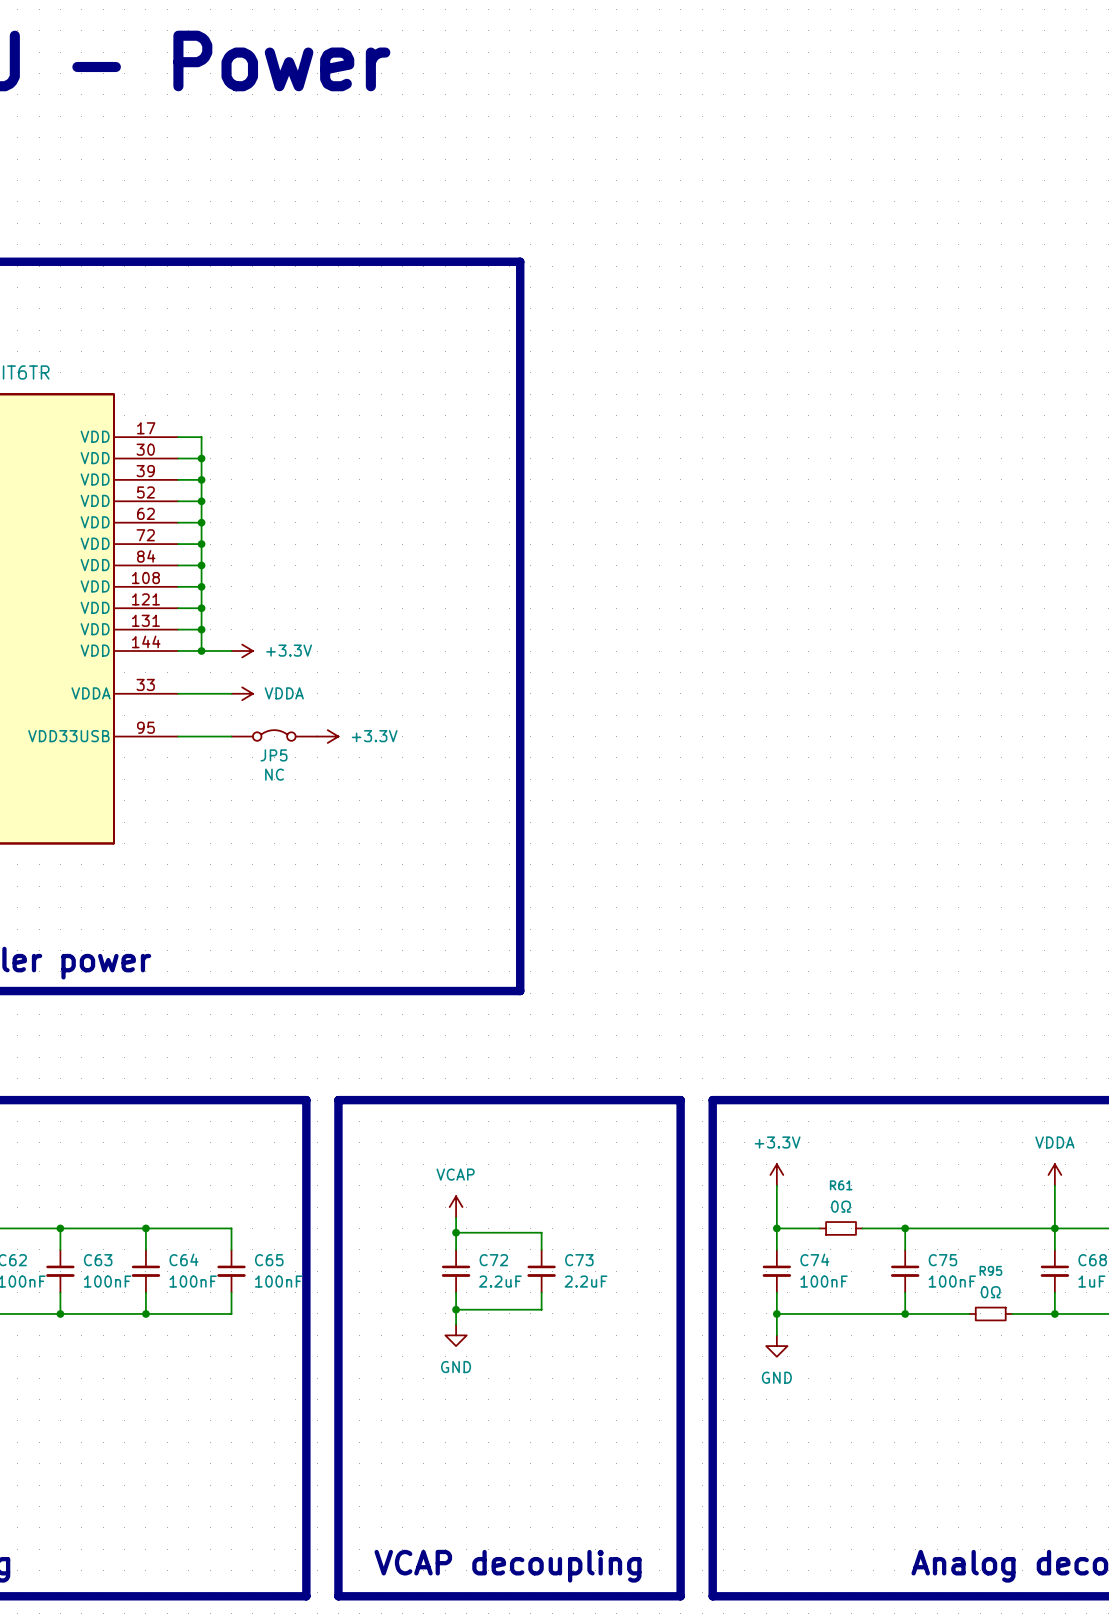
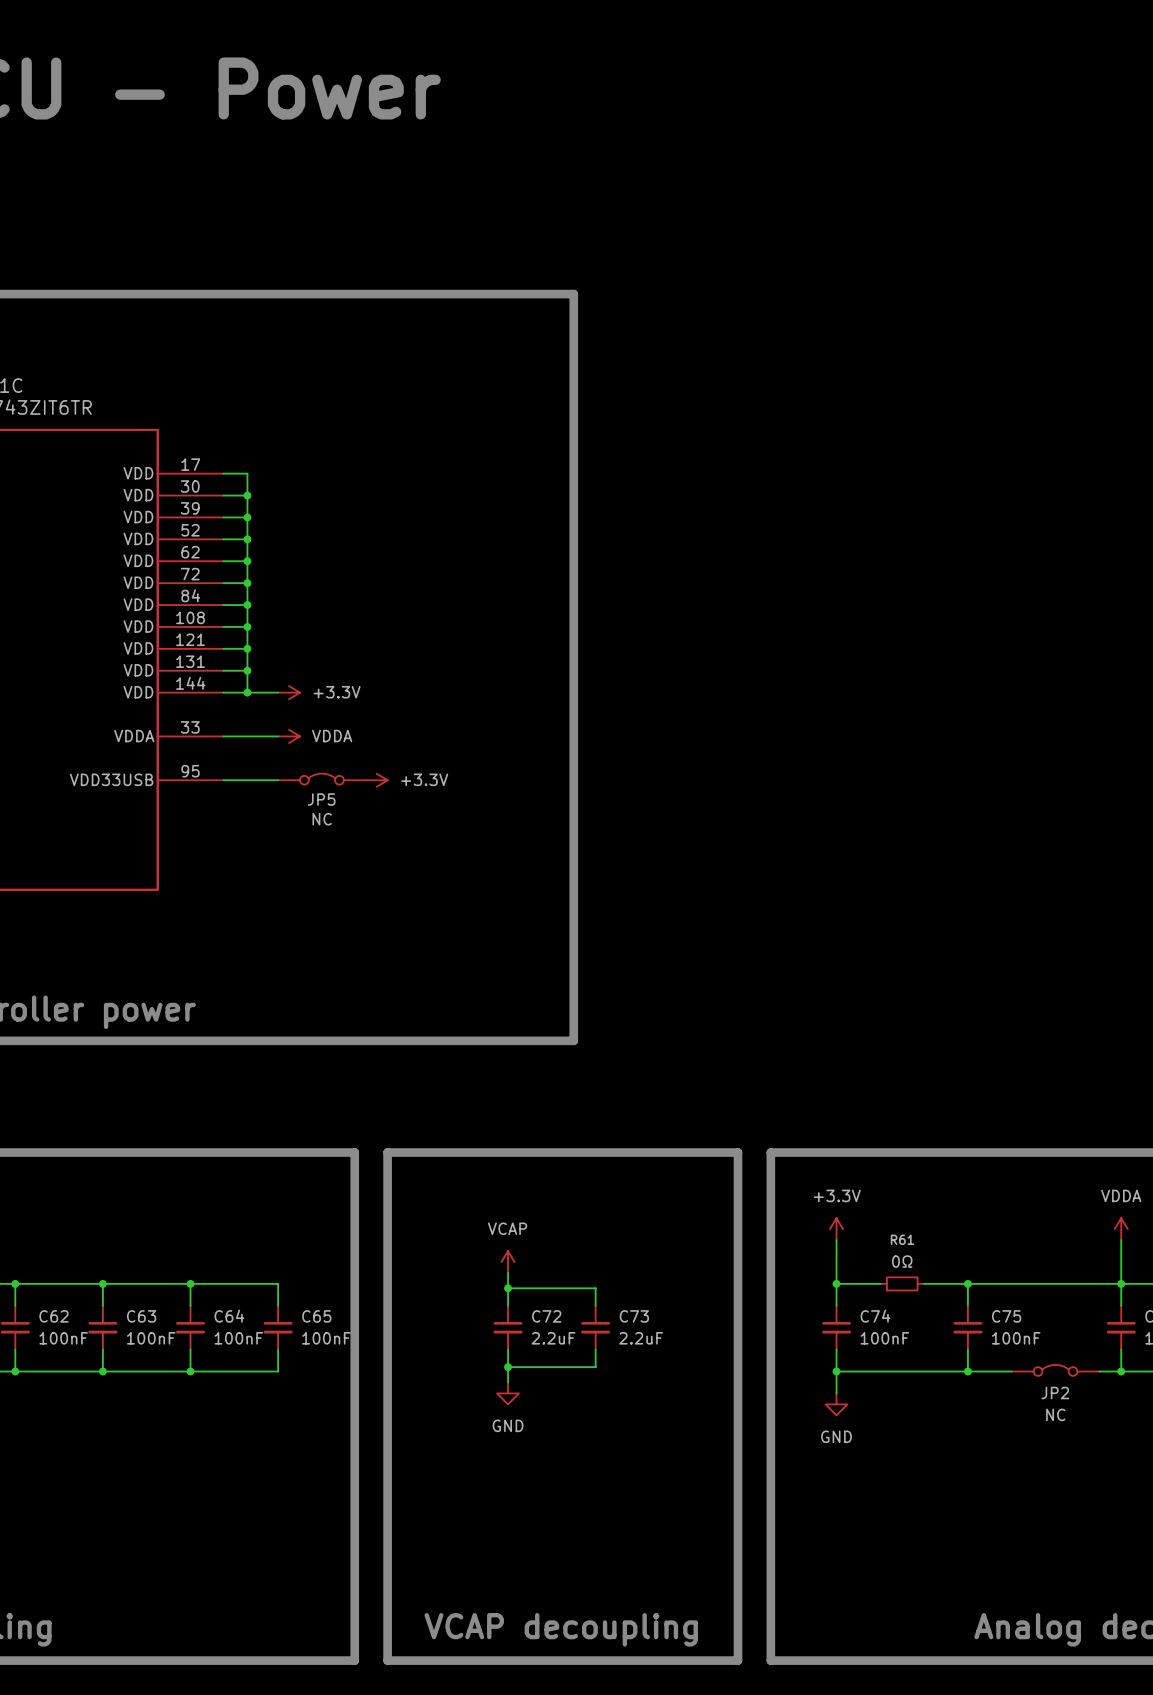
JP2: none -> NC (1055, 1370)
R95: 0Ω (990, 1313) -> none

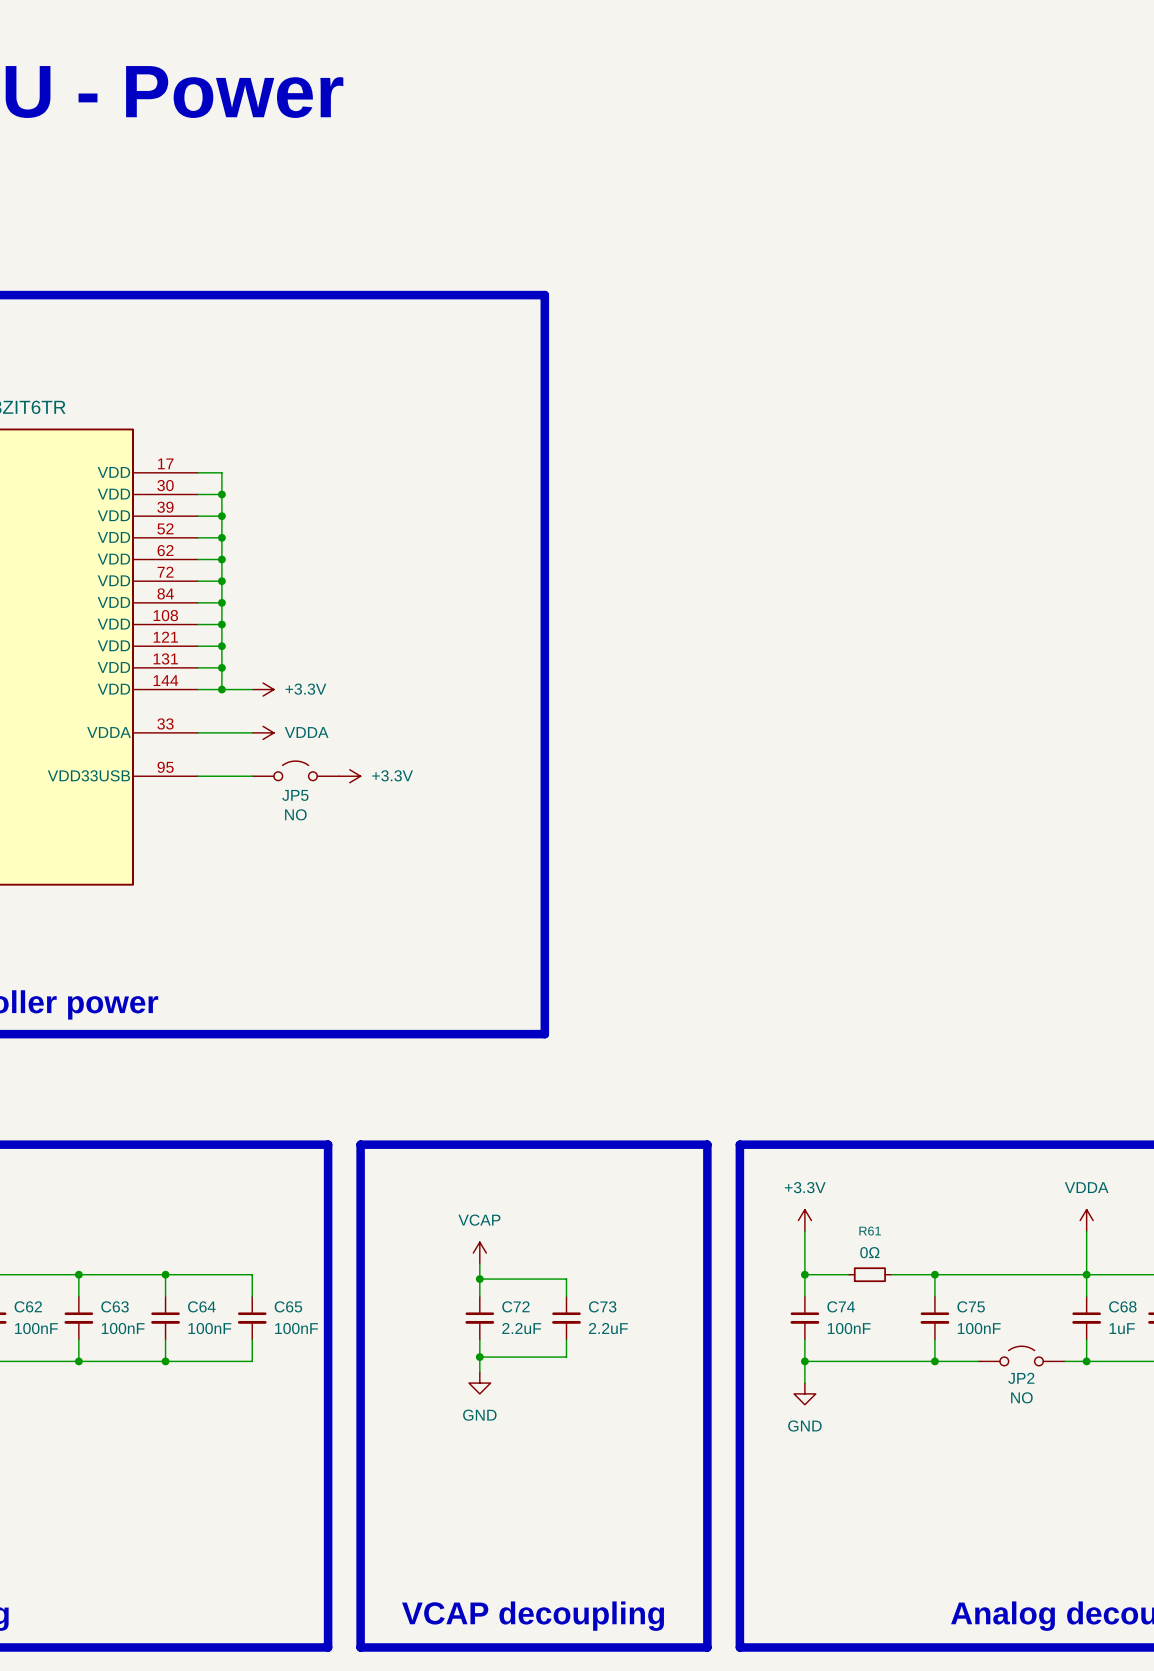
JP5 symbol: [278, 773, 366, 785] -> [252, 761, 339, 781]
JP5 value: NC (322, 819) -> NO (295, 814)
JP2 symbol: [1011, 1364, 1100, 1376] -> [978, 1346, 1065, 1366]
JP2 value: NC (1055, 1414) -> NO (1021, 1397)

